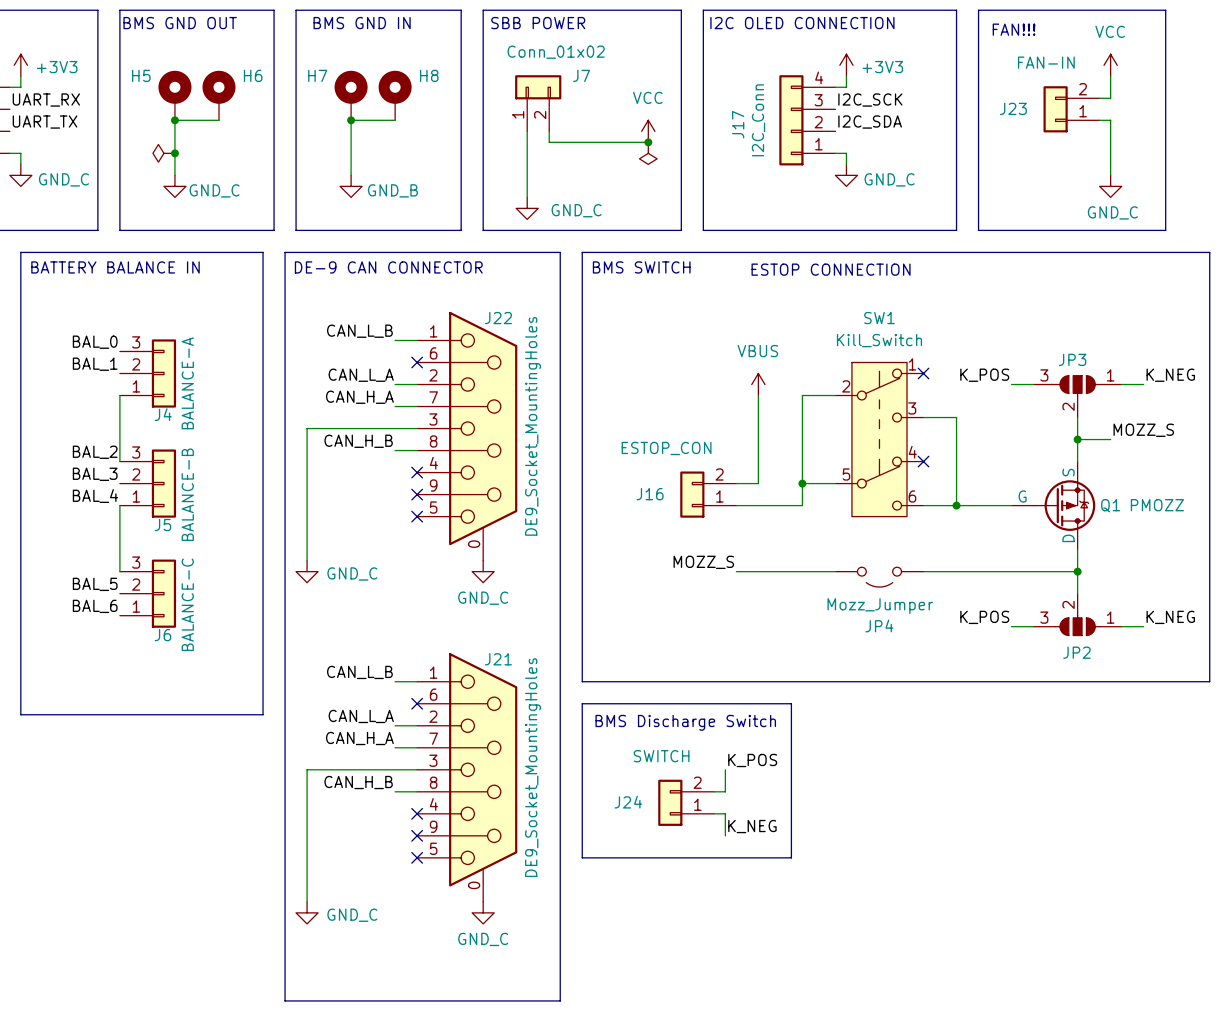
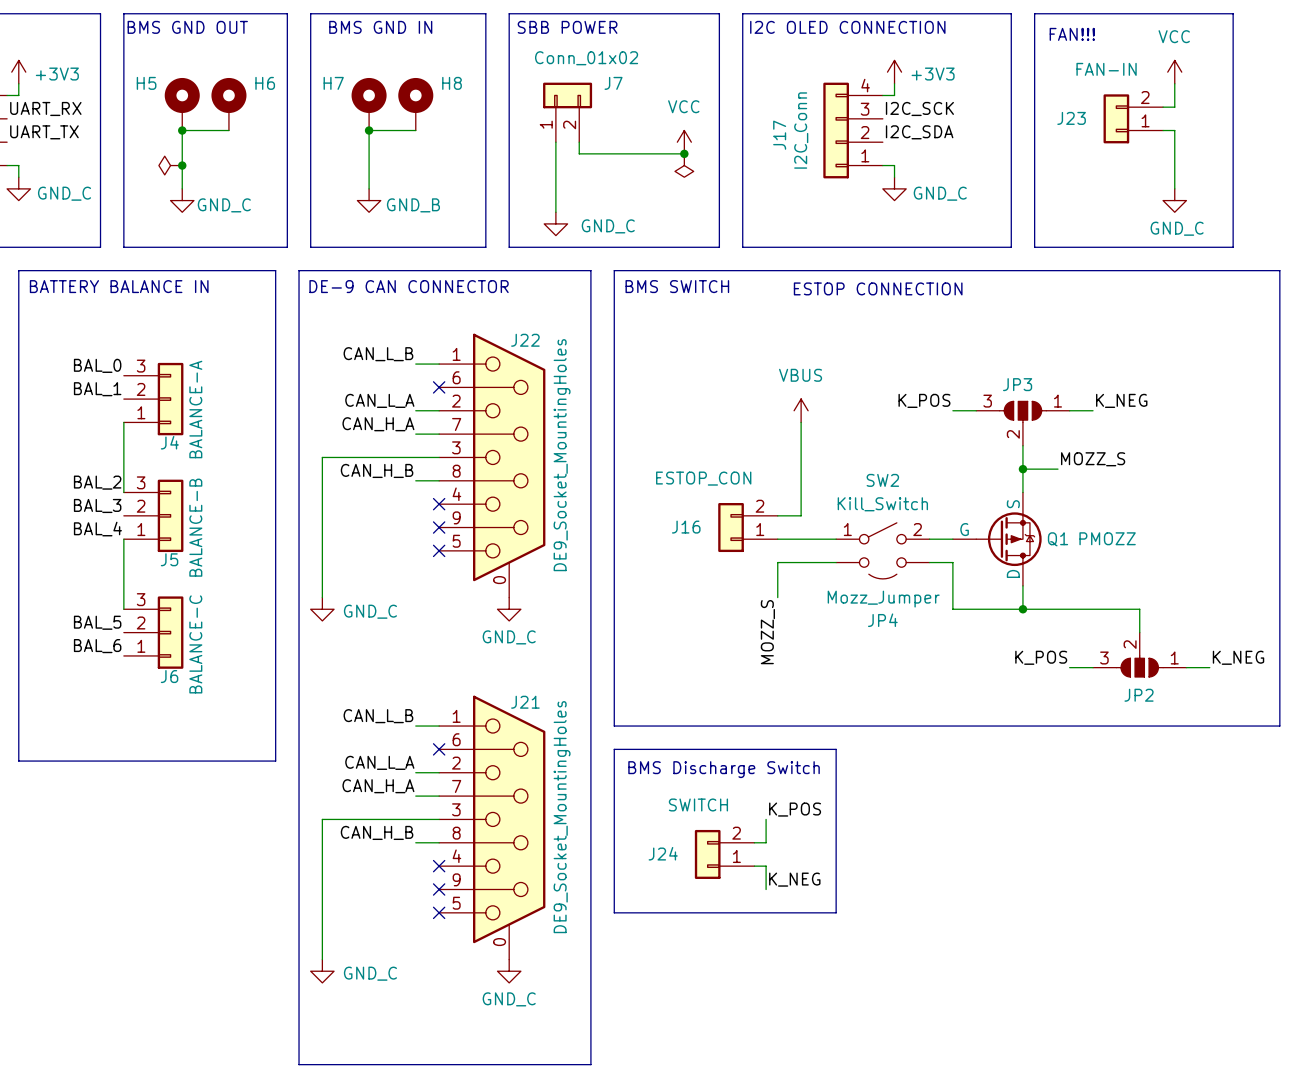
no-connect mark: (923, 373) -> none
label position: K_POS (984, 375) -> K_POS (924, 400)
label position: K_NEG (1170, 375) -> K_NEG (1121, 400)
wire: none -> (952, 410) (976, 410)
wire: (1121, 384) (1143, 384) -> none
wire: (835, 395) (802, 395) (802, 505) (791, 505) -> none
JP3 position: (1077, 396) -> (1022, 423)
wire: (923, 417) (956, 417) (956, 505) -> none
wire: (1077, 417) (1077, 461) -> (1022, 445) (1022, 492)
label position: MOZZ_S (1143, 430) -> MOZZ_S (1093, 459)
SW1: Kill_Switch (879, 439) -> none
junction: none -> (1022, 469)
wire: (1077, 439) (1110, 439) -> (1022, 469) (1057, 469)
junction: (1077, 439) -> none
no-connect mark: (923, 461) -> none
wire: (802, 483) (835, 483) -> none
junction: (802, 483) -> none
SW2: none -> Kill_Switch (882, 533)
junction: (956, 505) -> none
Q1 position: (1053, 505) -> (997, 539)
wire: none -> (836, 562) (777, 562) (777, 597)
wire: none -> (929, 562) (952, 562) (952, 609) (976, 609)
wire: (1077, 549) (1077, 571) -> (1022, 585) (1022, 609)
label rotation: 0° (703, 562) -> 90° counterclockwise (767, 632)
wire: (736, 571) (835, 571) -> none
junction: none -> (1022, 609)
junction: (1077, 571) -> none
JP4 position: (879, 577) -> (882, 568)

